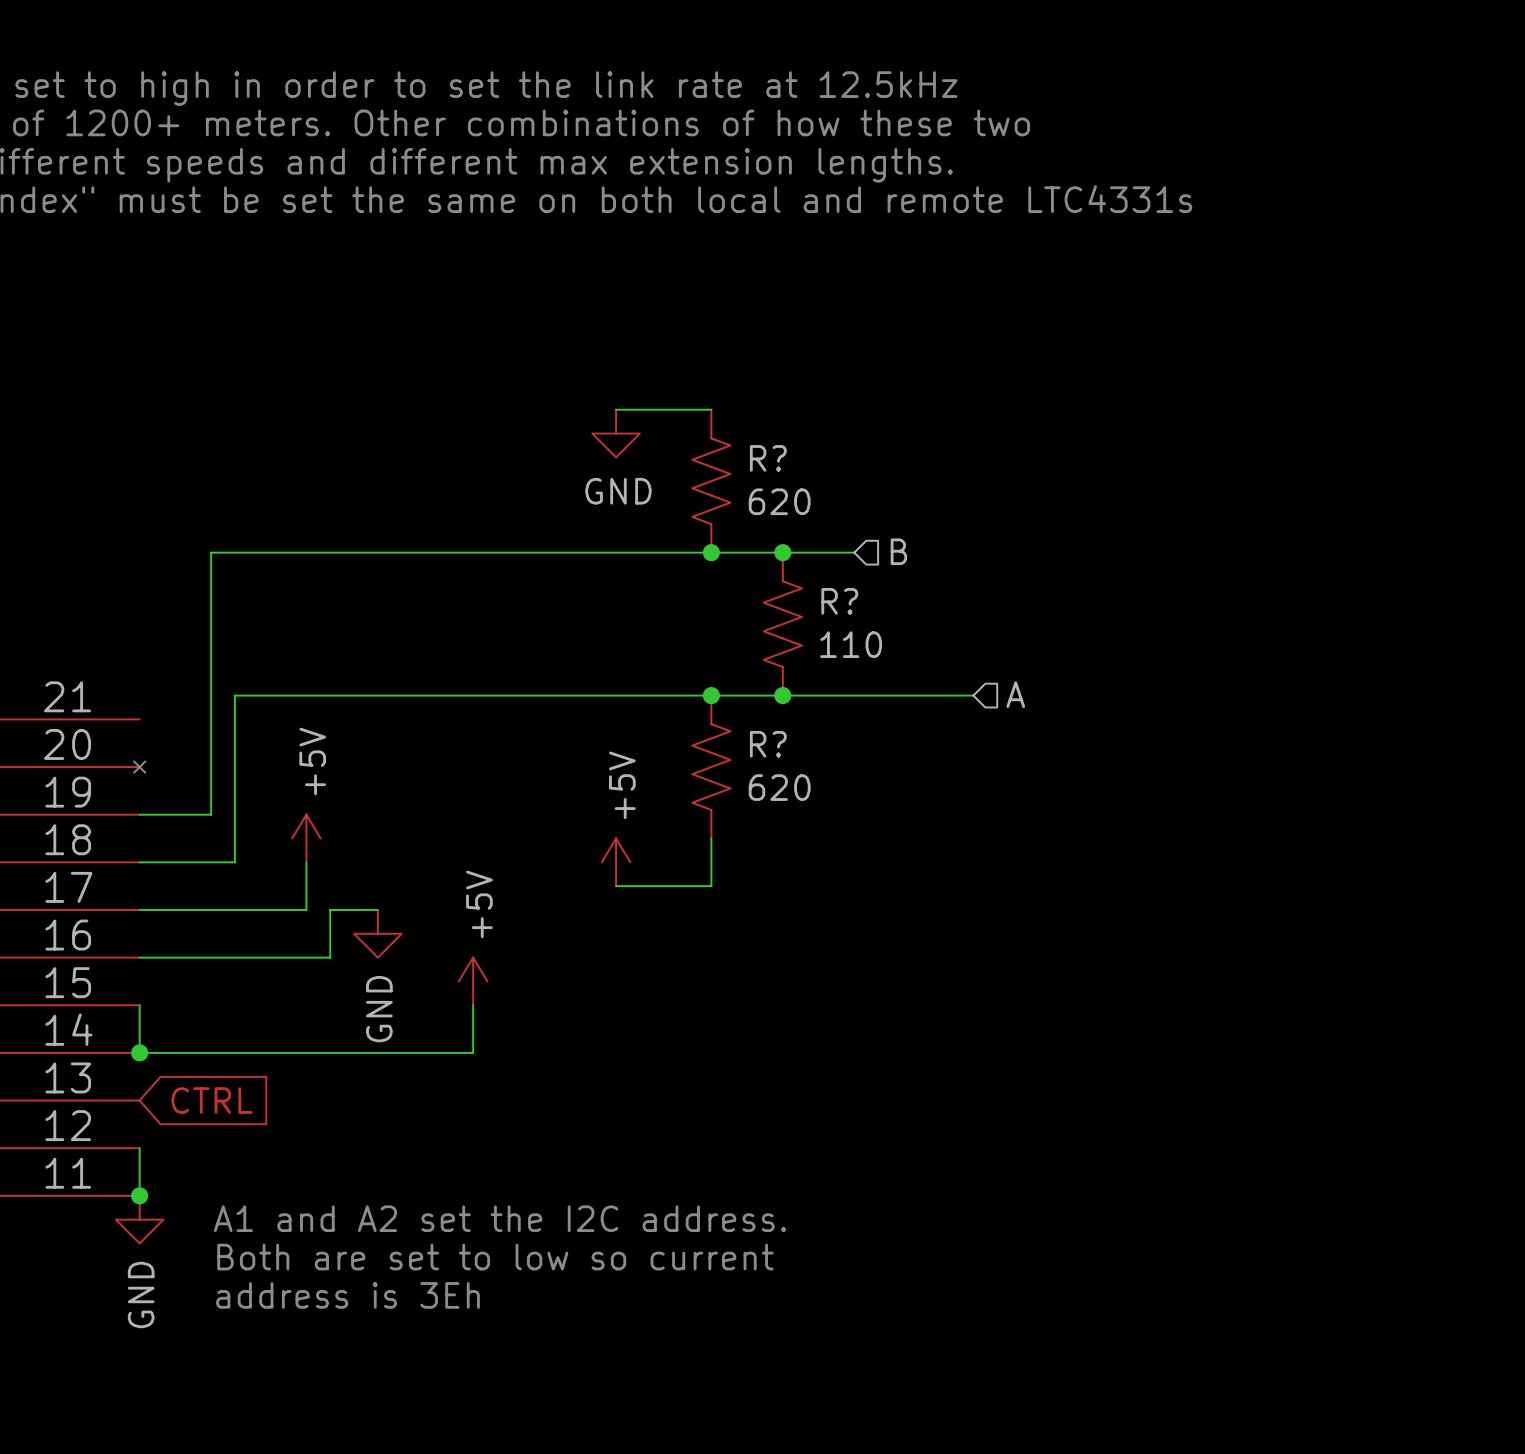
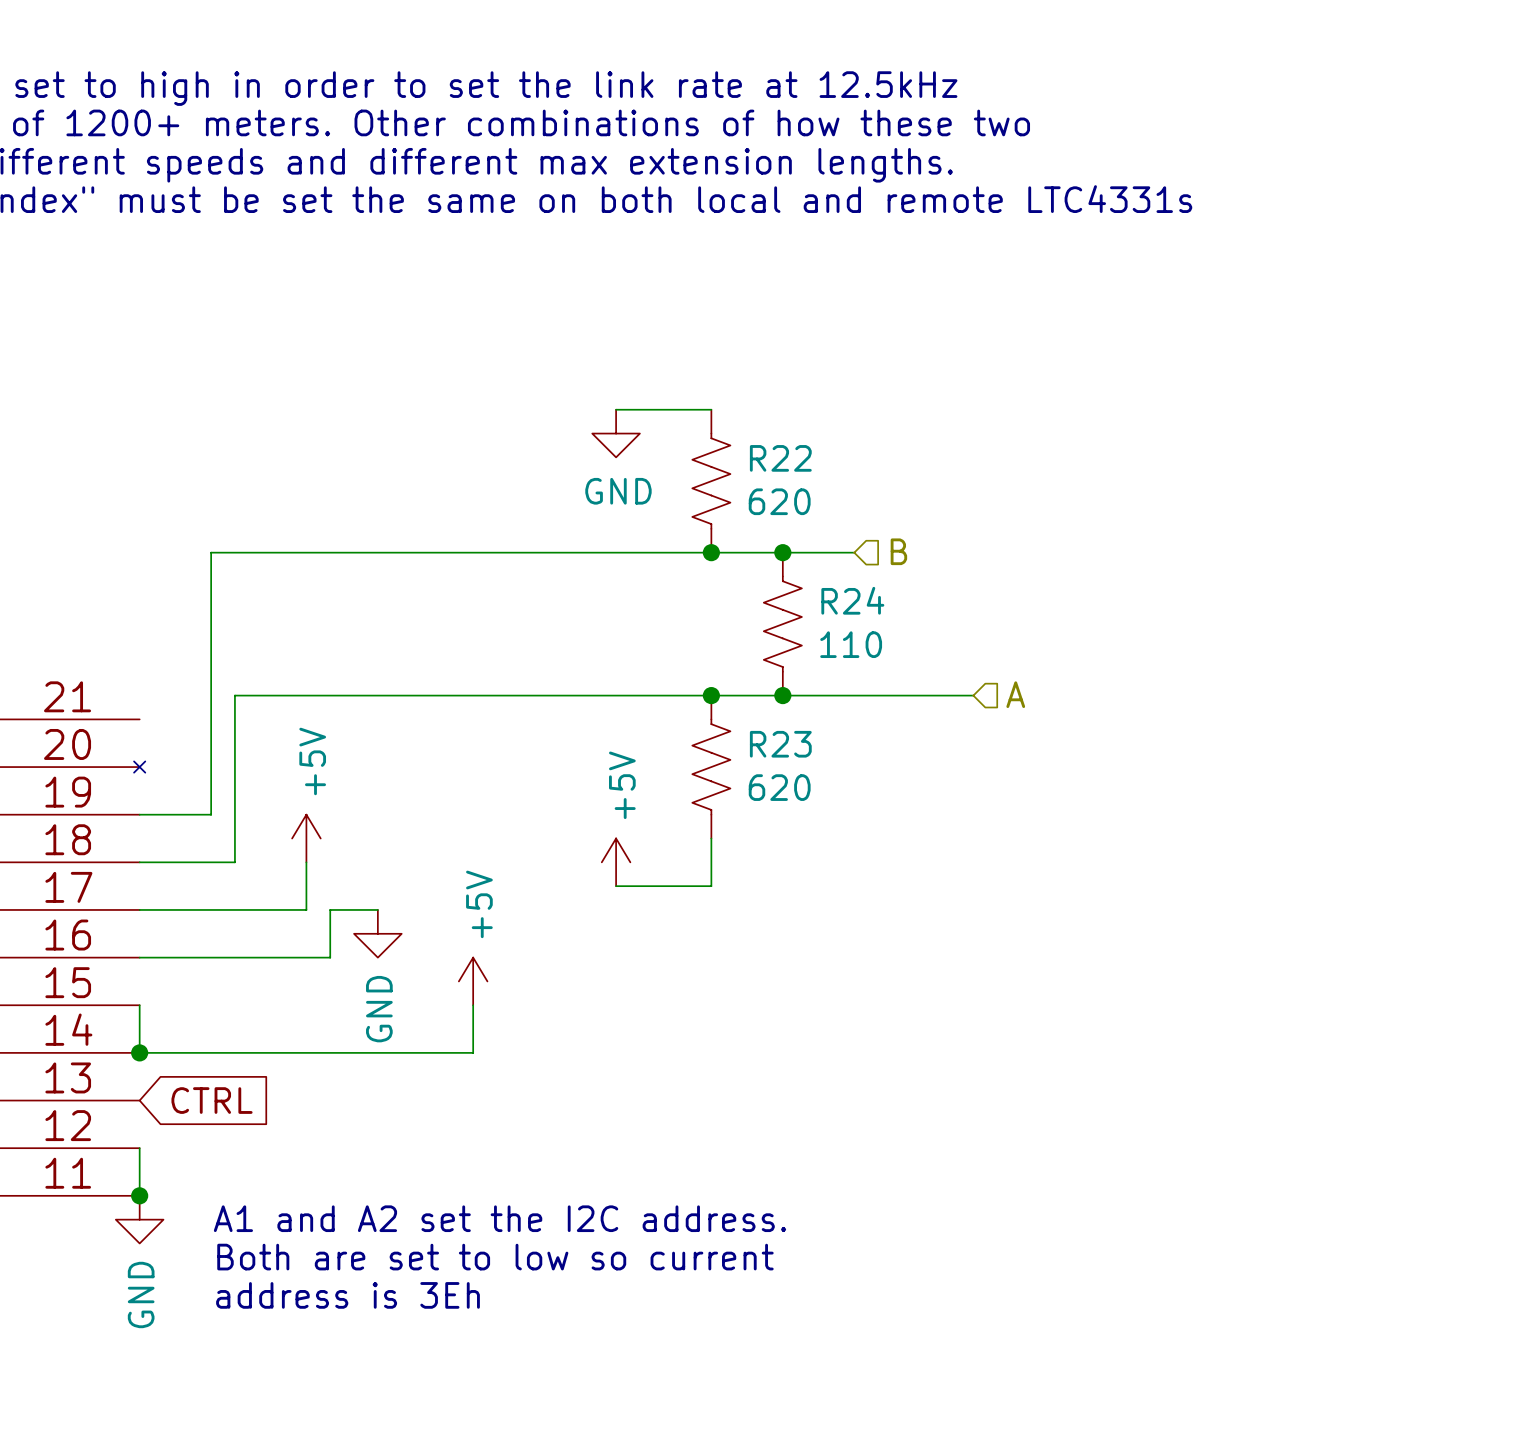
R? name: R? (768, 458) -> R22 (780, 458)
R? name: R? (839, 601) -> R24 (852, 600)
R? name: R? (768, 744) -> R23 (780, 744)

